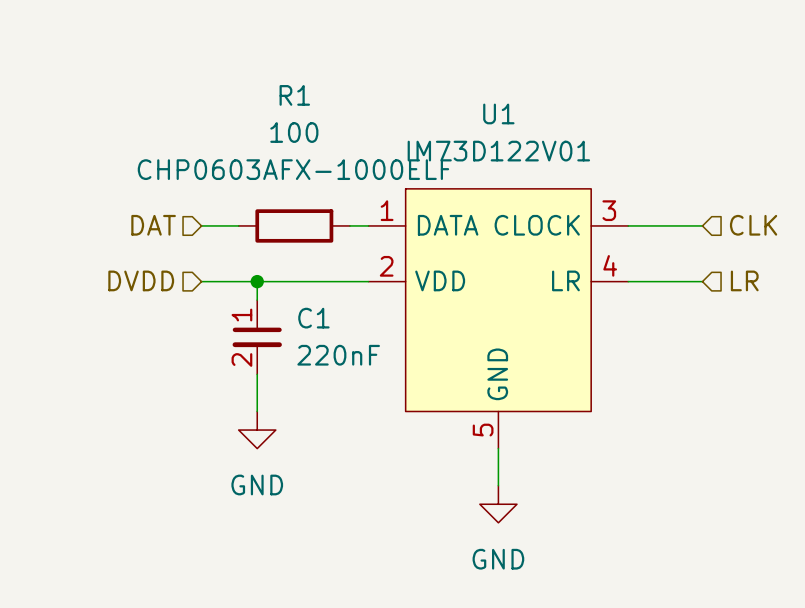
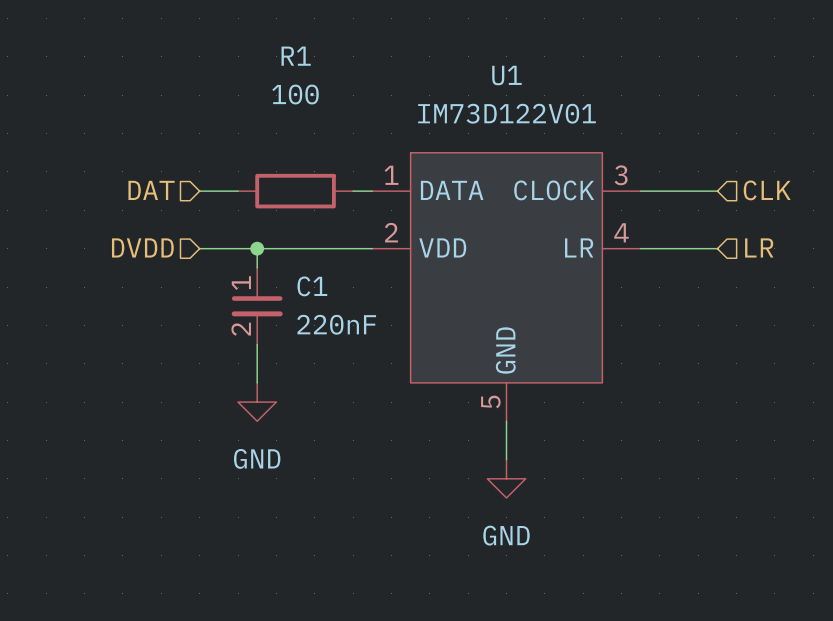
R1 text: CHP0603AFX-1000ELF (294, 169) -> none

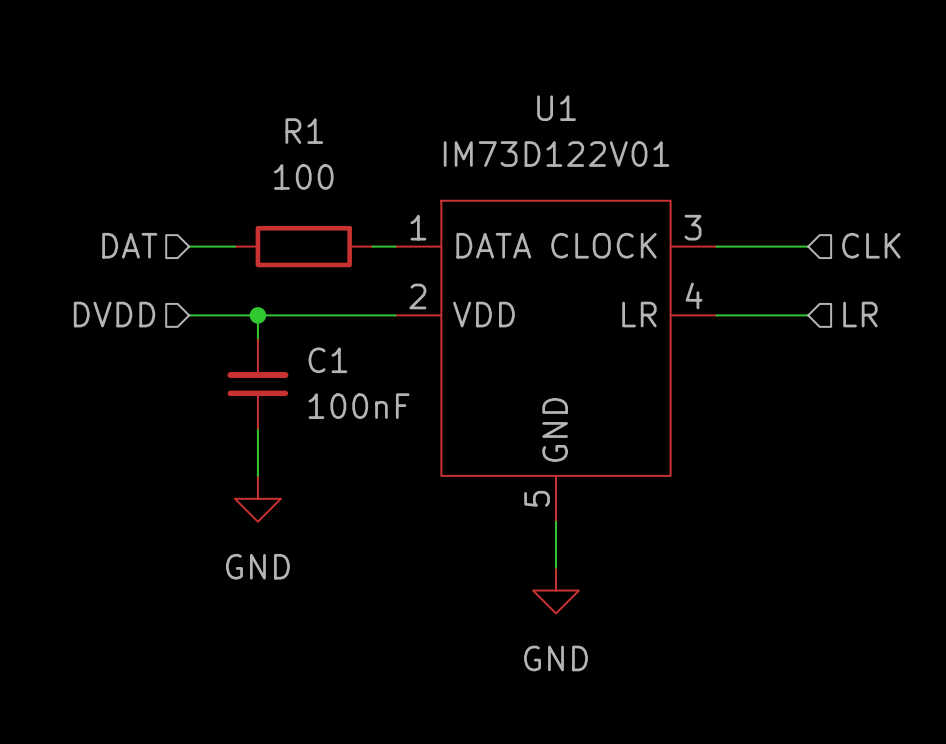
R1 name position: R1 (296, 56) -> R1 (304, 131)
R1 value position: 100 (295, 94) -> 100 (303, 176)
C1 symbol: [231, 267, 283, 345] -> [227, 338, 289, 431]
C1 value: 220nF (336, 324) -> 100nF (359, 406)

